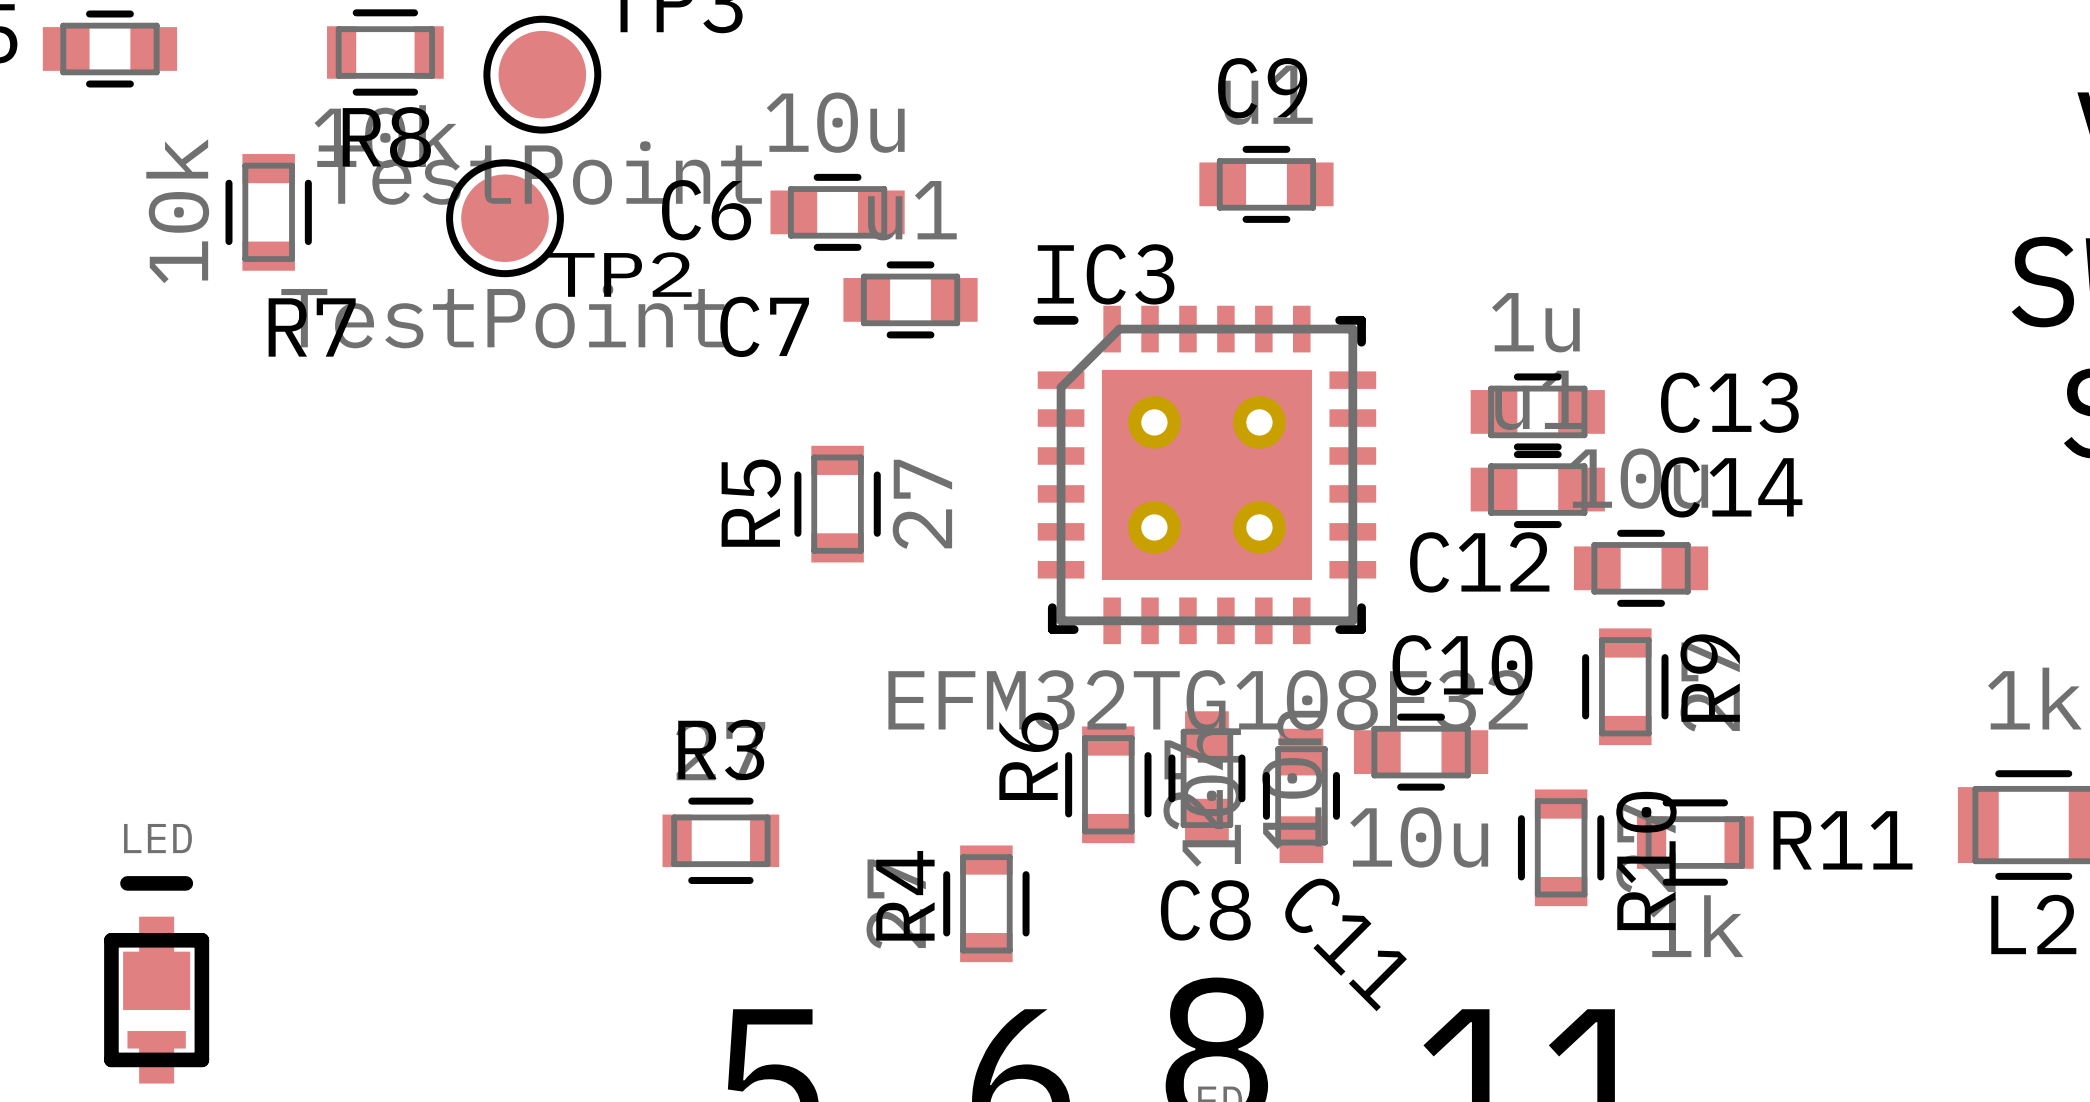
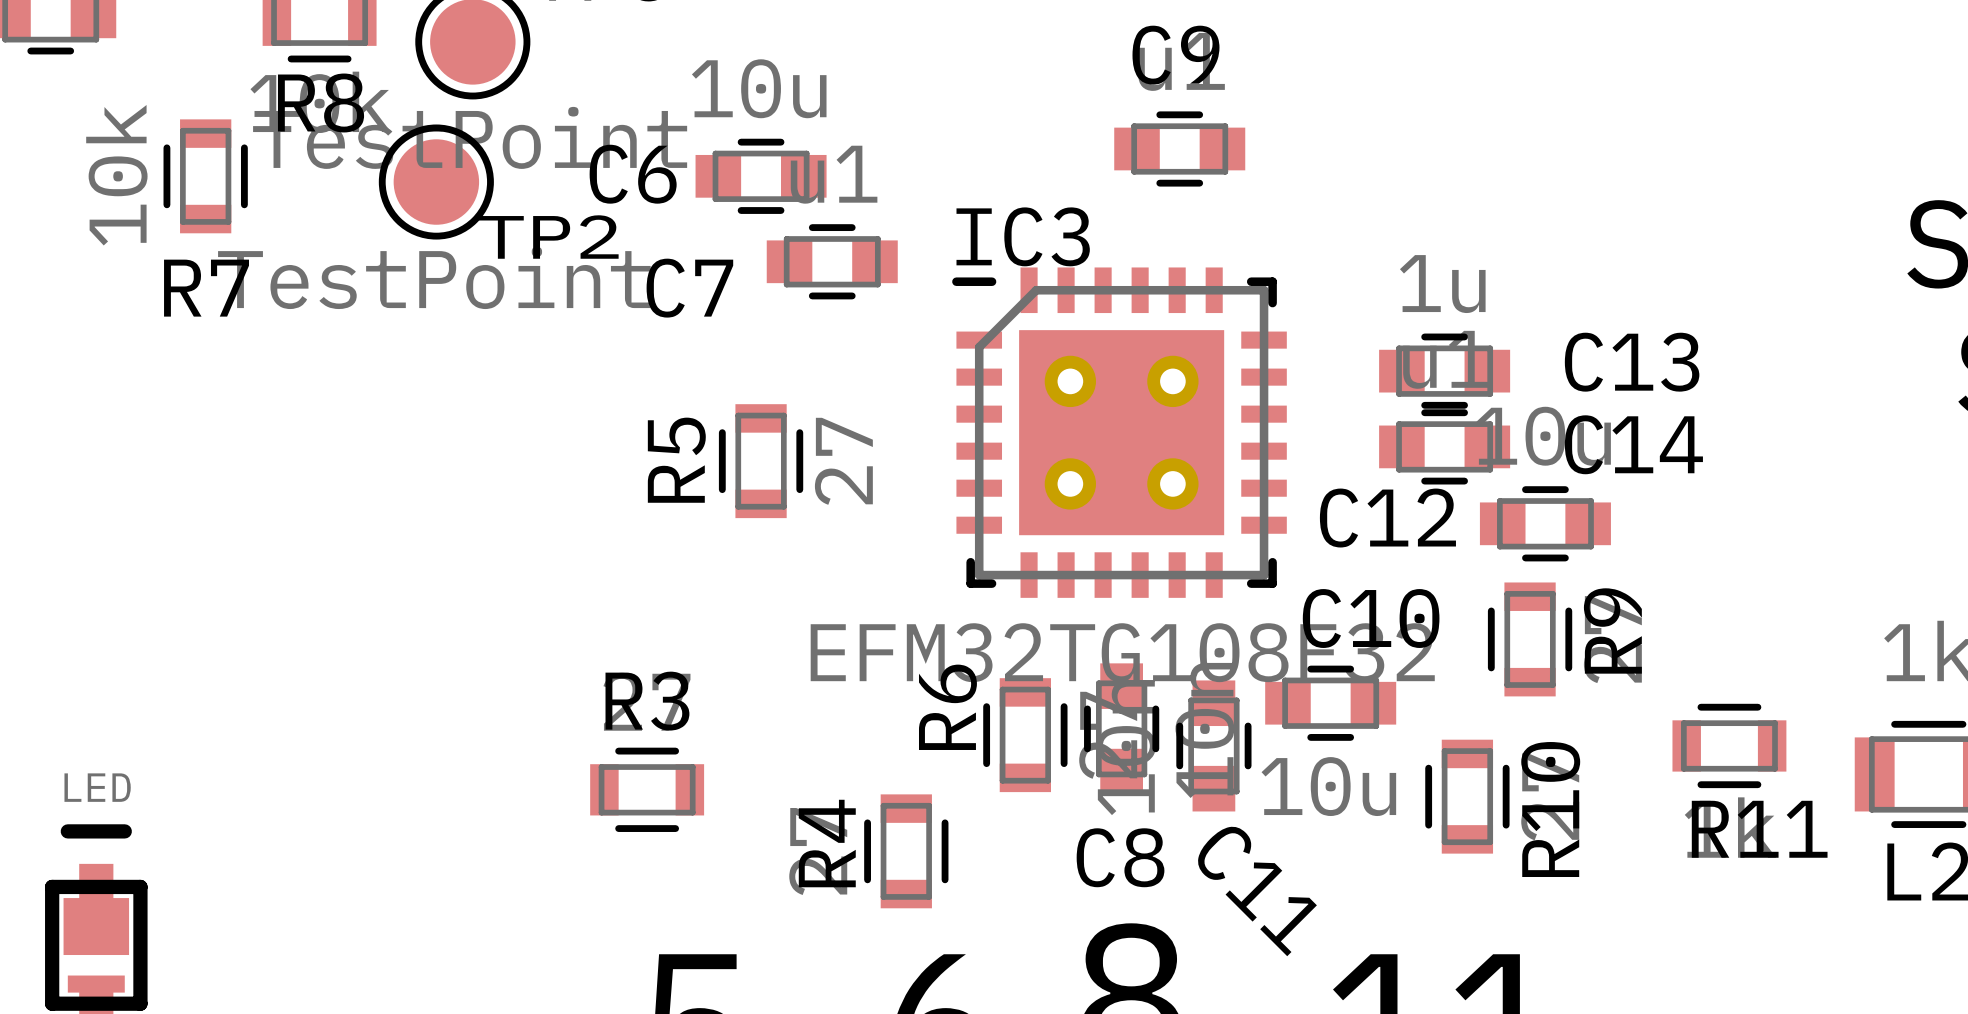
R7 name position: R7 (312, 327) -> R7 (206, 288)
R11 name position: R11 (1842, 840) -> R11 (1759, 829)
R11 position: (1695, 842) -> (1729, 745)

